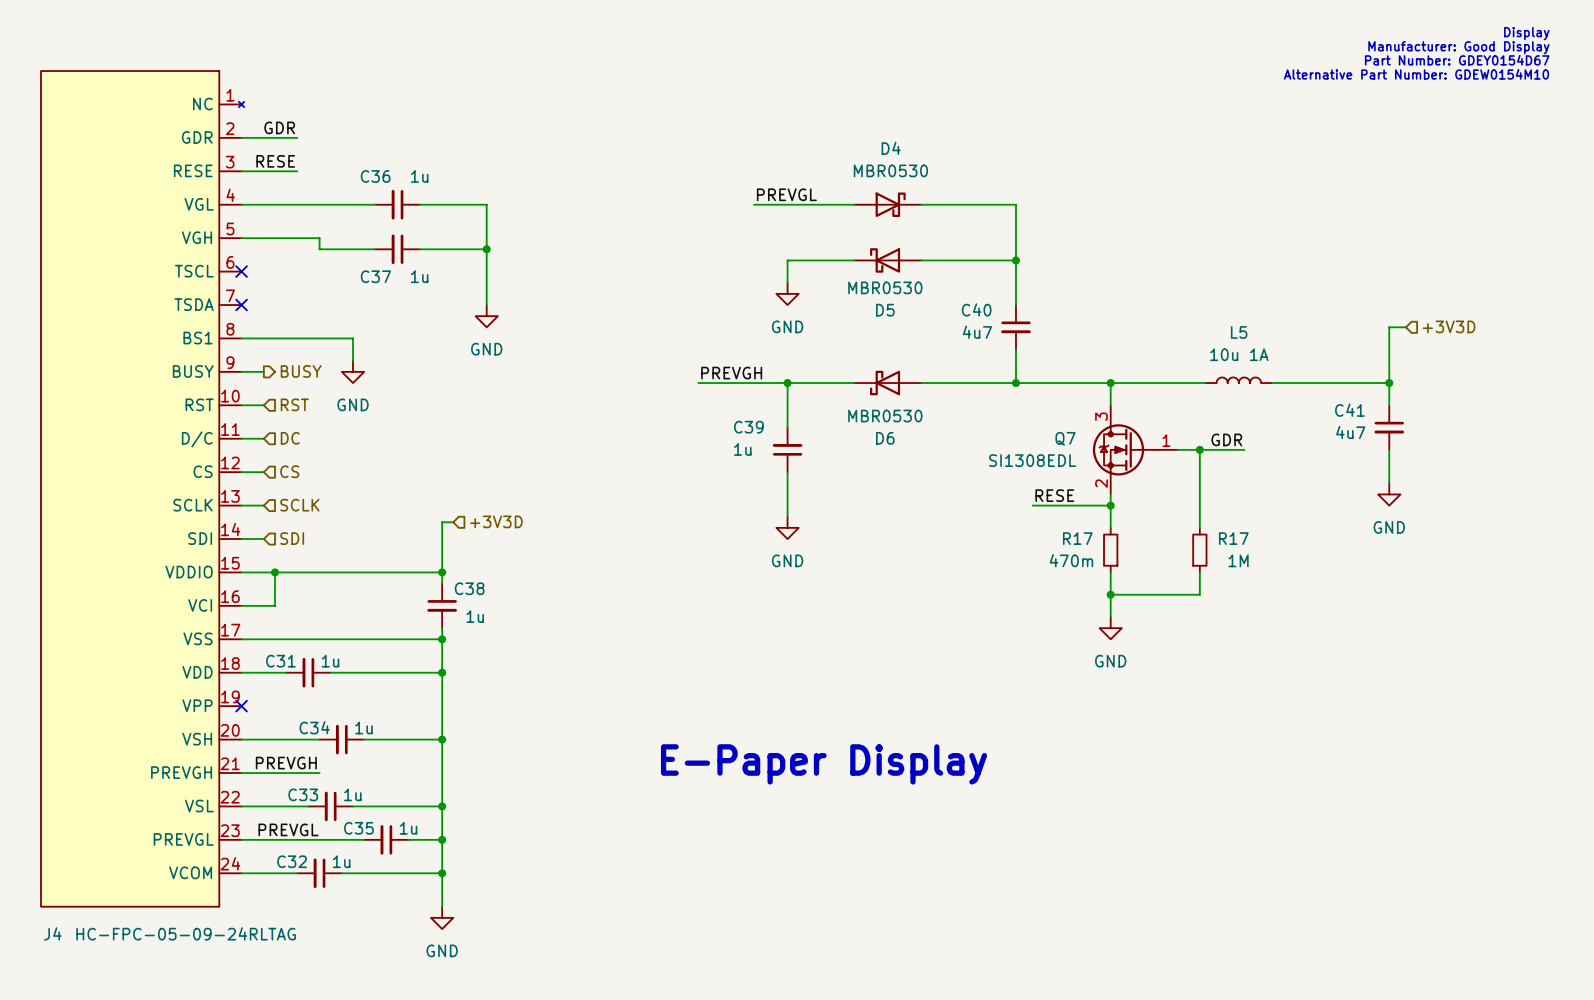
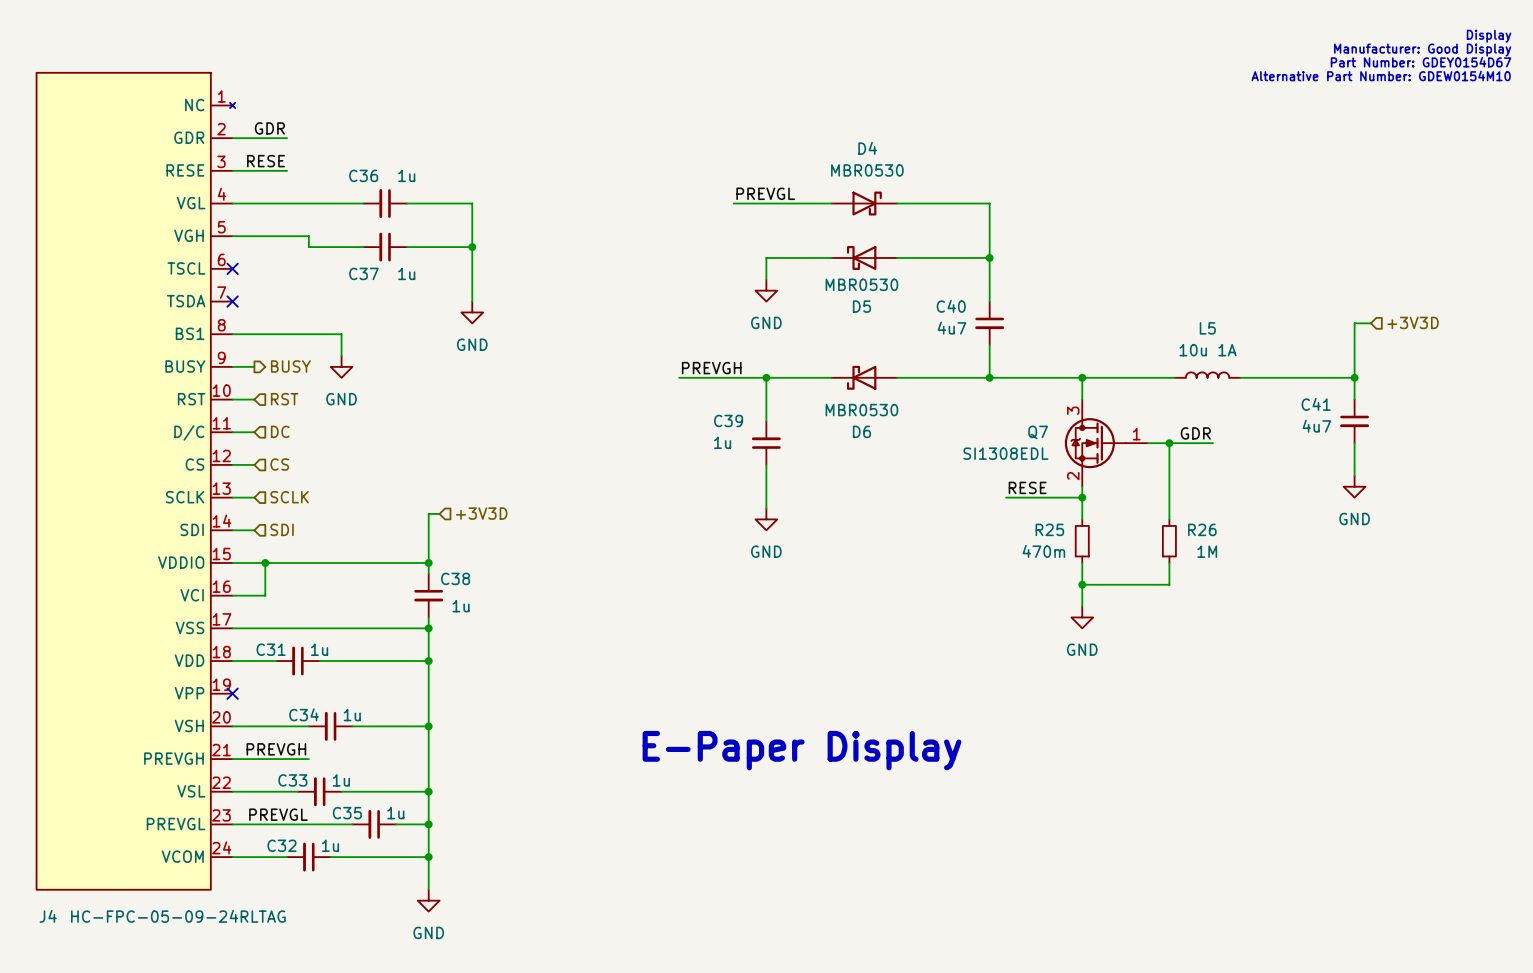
R17 name: R17 (1077, 538) -> R25 (1049, 529)
R17 name: R17 (1233, 538) -> R26 (1202, 529)

